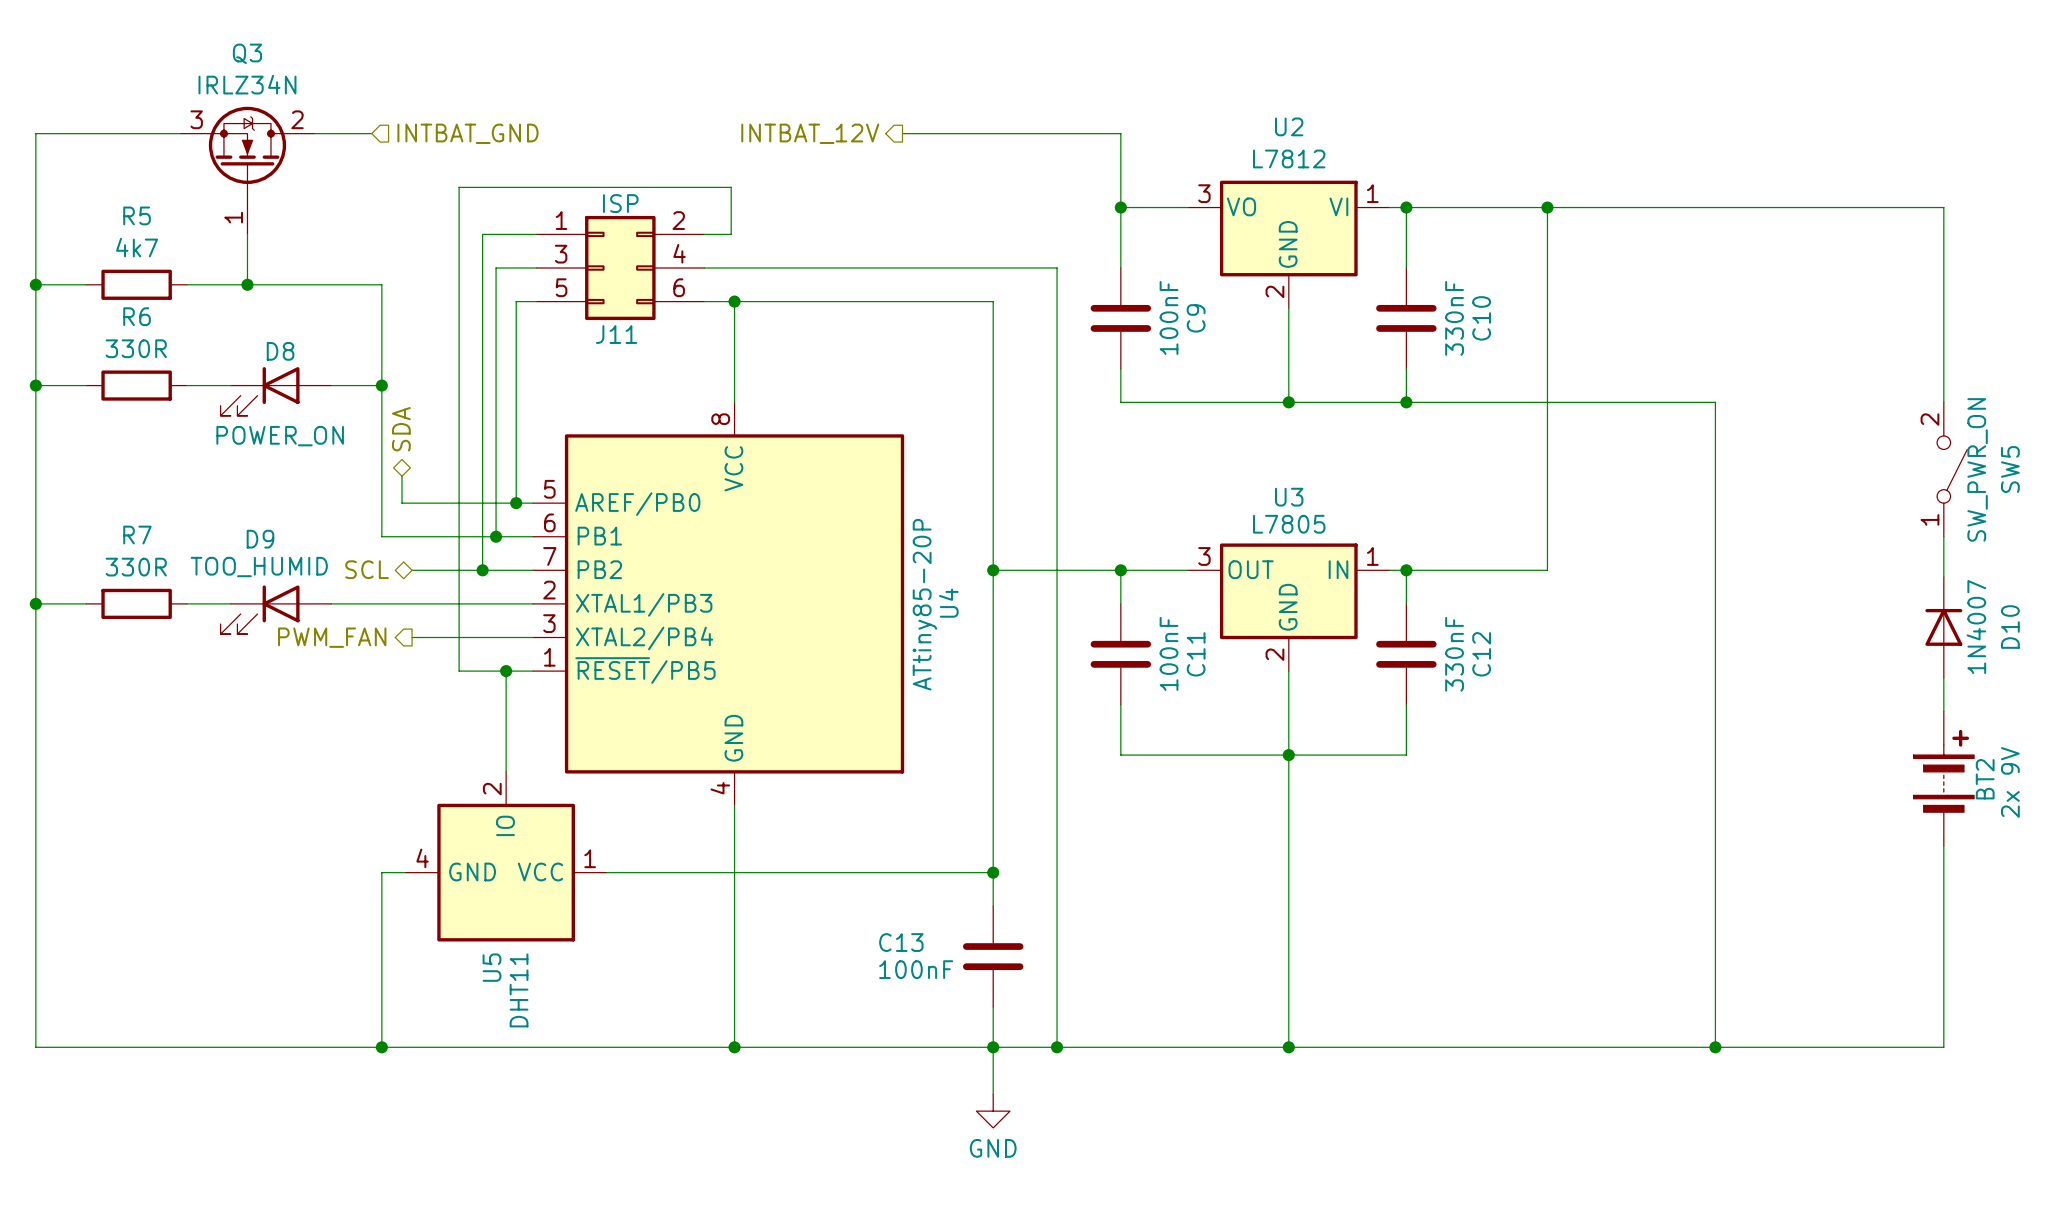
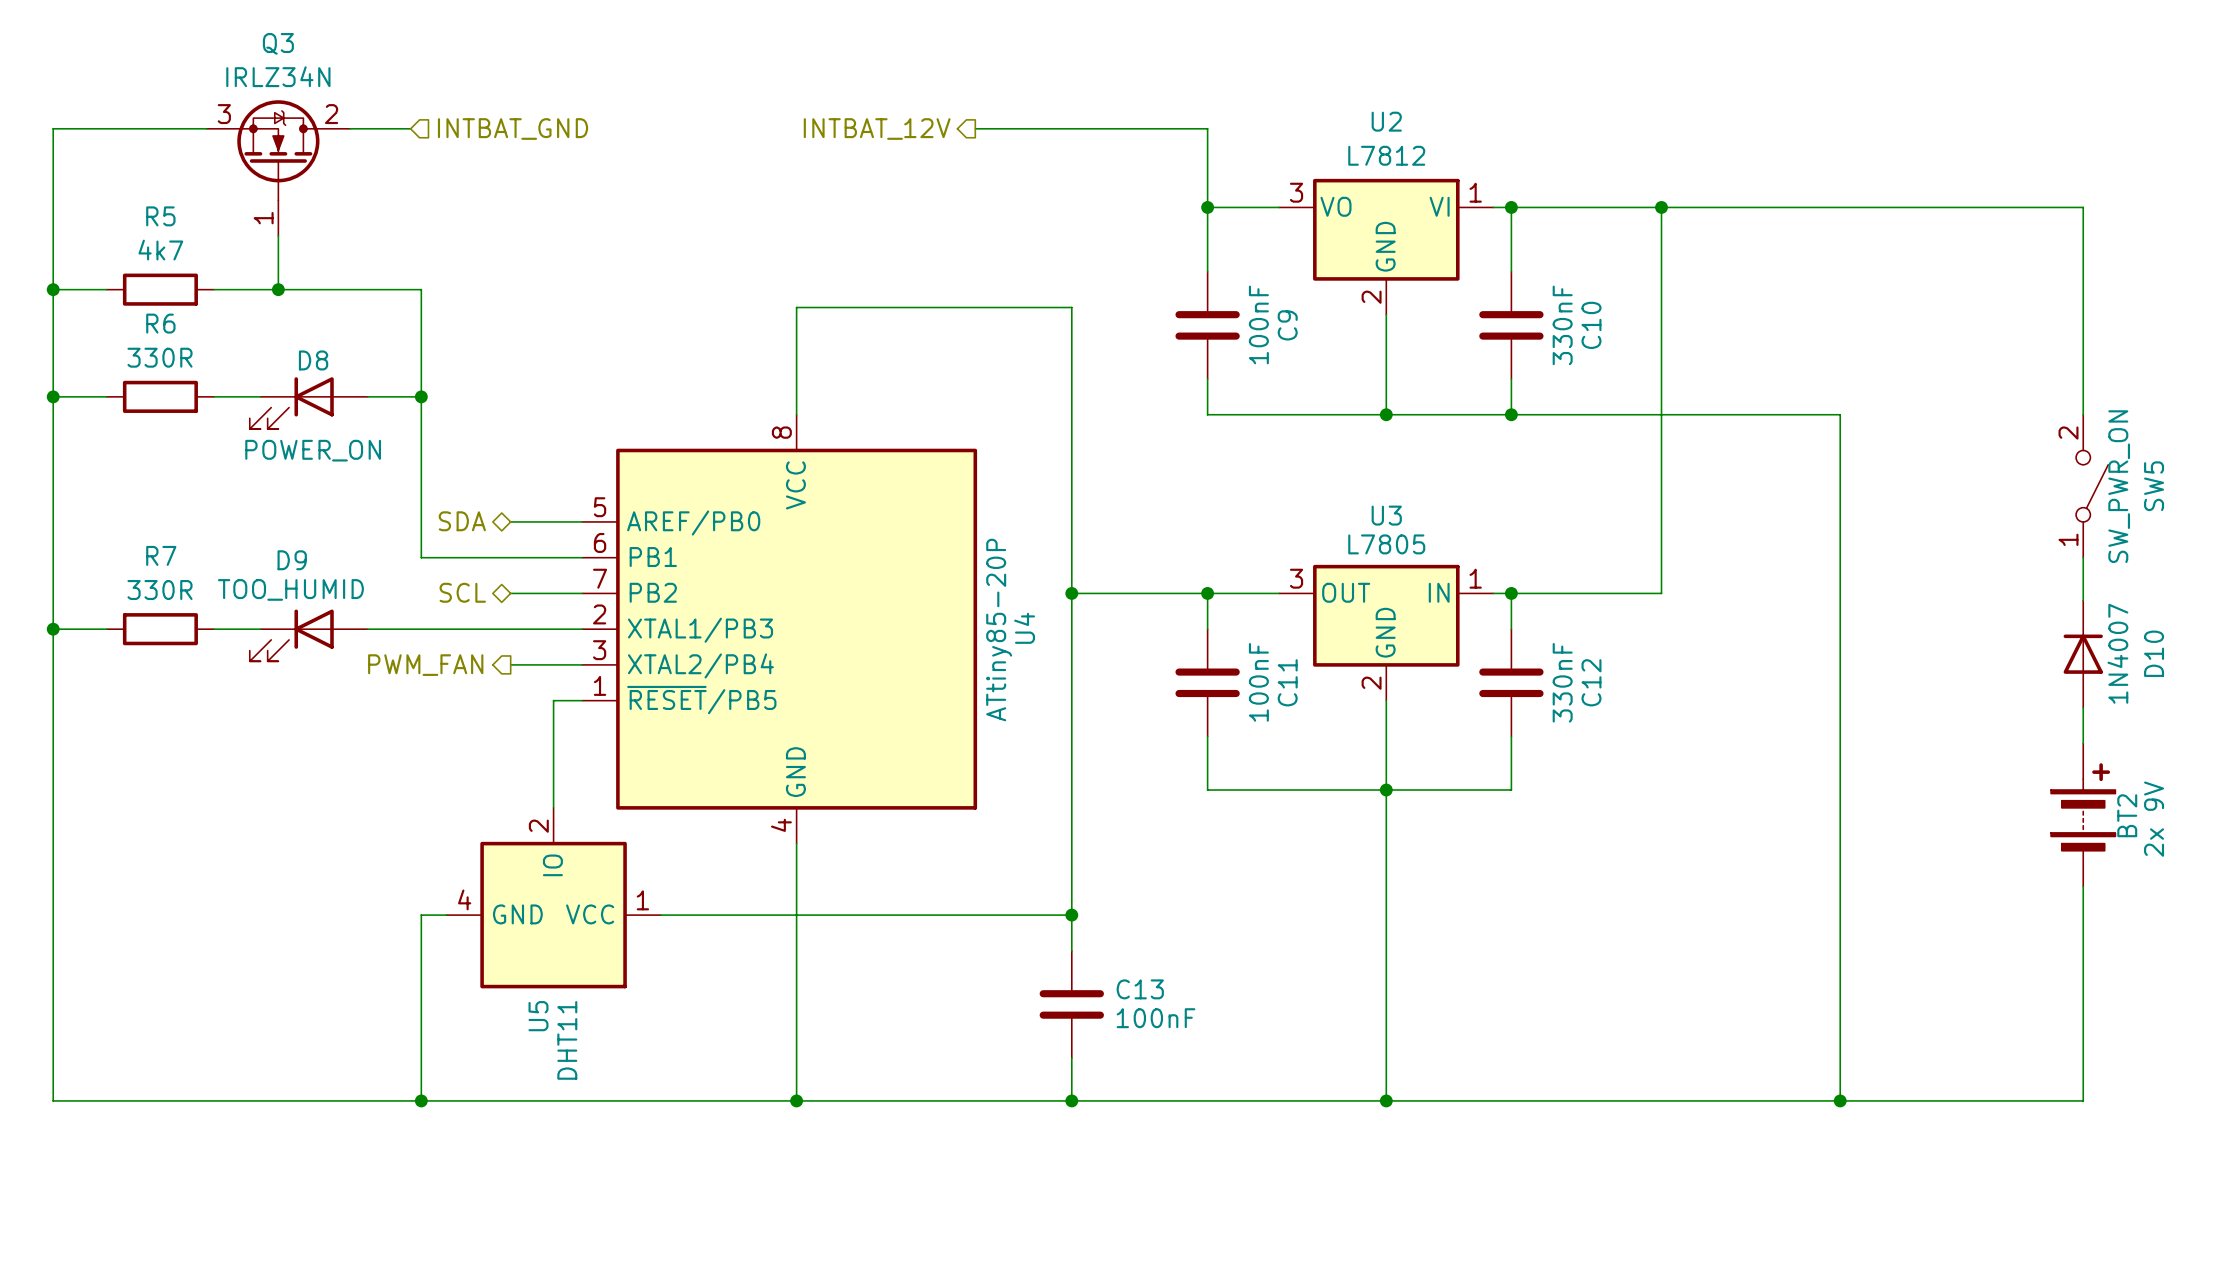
wire: (536, 234) (482, 234) (482, 570) -> none
wire: (704, 234) (731, 234) (731, 187) (459, 187) (459, 671) (506, 671) -> none
wire: (536, 268) (496, 268) (496, 536) -> none
J11: ISP (620, 268) -> none
wire: (704, 268) (1057, 268) (1057, 1047) -> none
wire: (536, 301) (516, 301) (516, 503) -> none
wire: (704, 301) (734, 301) -> none
junction: (734, 301) -> none
hierarchical label rotation: 0° (401, 429) -> 90° counterclockwise (462, 521)
hierarchical label position: SDA (401, 429) -> SDA (462, 521)
wire: (401, 476) (401, 503) (465, 503) -> none
junction: (516, 503) -> none
junction: (496, 536) -> none
hierarchical label position: SCL (367, 569) -> SCL (462, 592)
wire: (412, 570) (465, 570) -> none
junction: (482, 570) -> none
hierarchical label position: PWM_FAN (332, 637) -> PWM_FAN (425, 665)
wire: (412, 637) (465, 637) -> none
junction: (506, 671) -> none
C13 name position: C13 (901, 942) -> C13 (1140, 989)
C13 value position: 100nF (916, 969) -> 100nF (1156, 1018)
wire: (993, 1047) (993, 1094) -> none
junction: (1057, 1047) -> none
power symbol: GND (993, 1111) -> none

